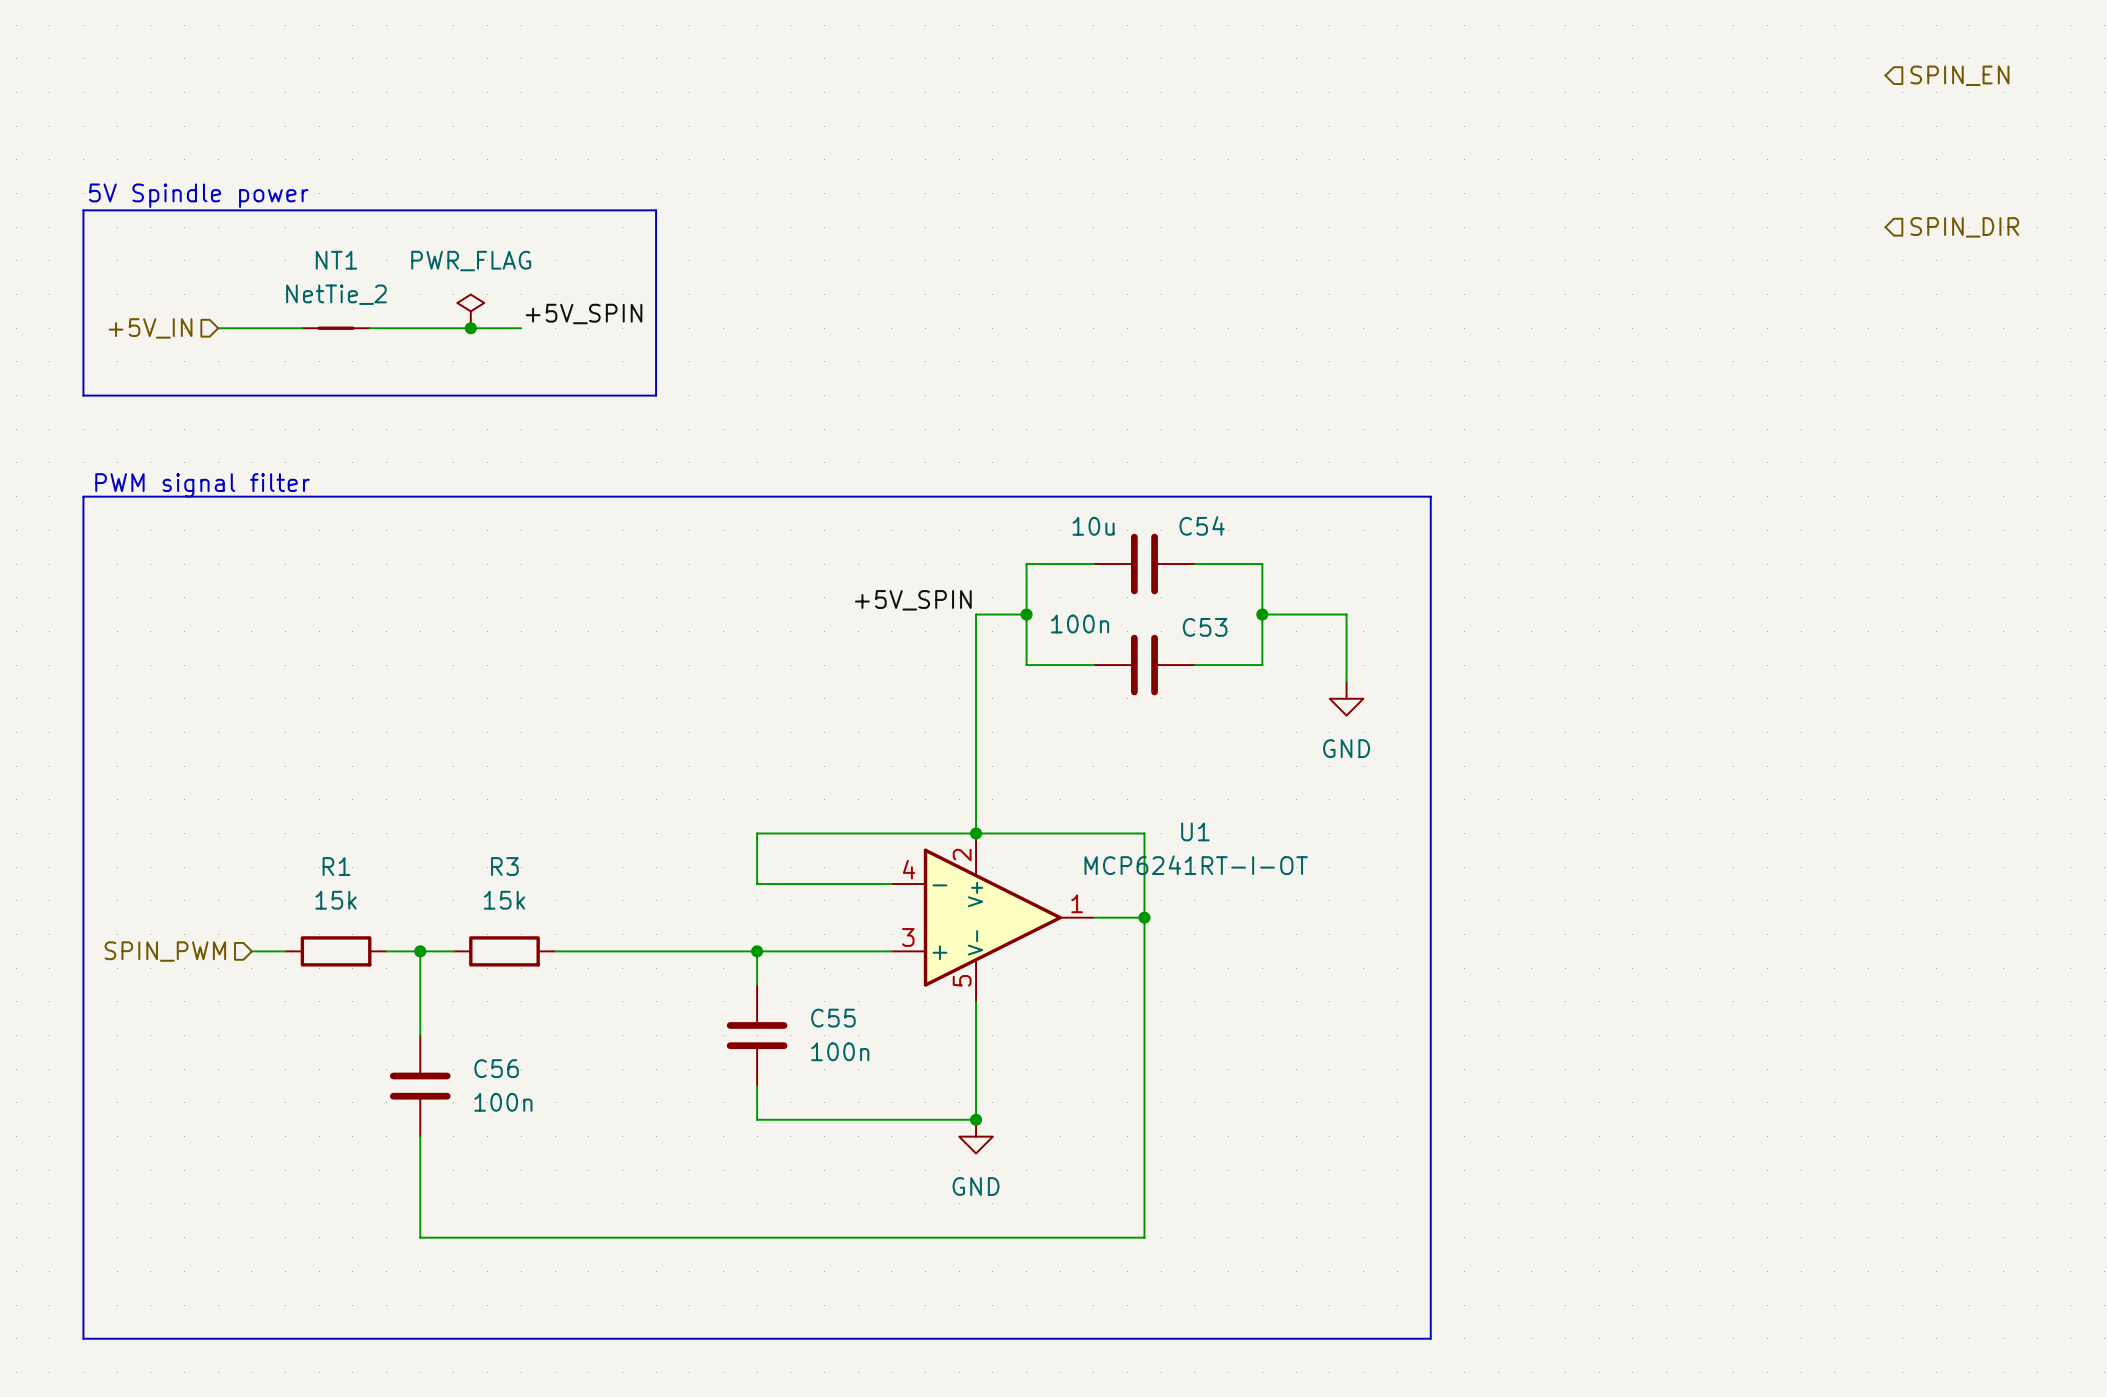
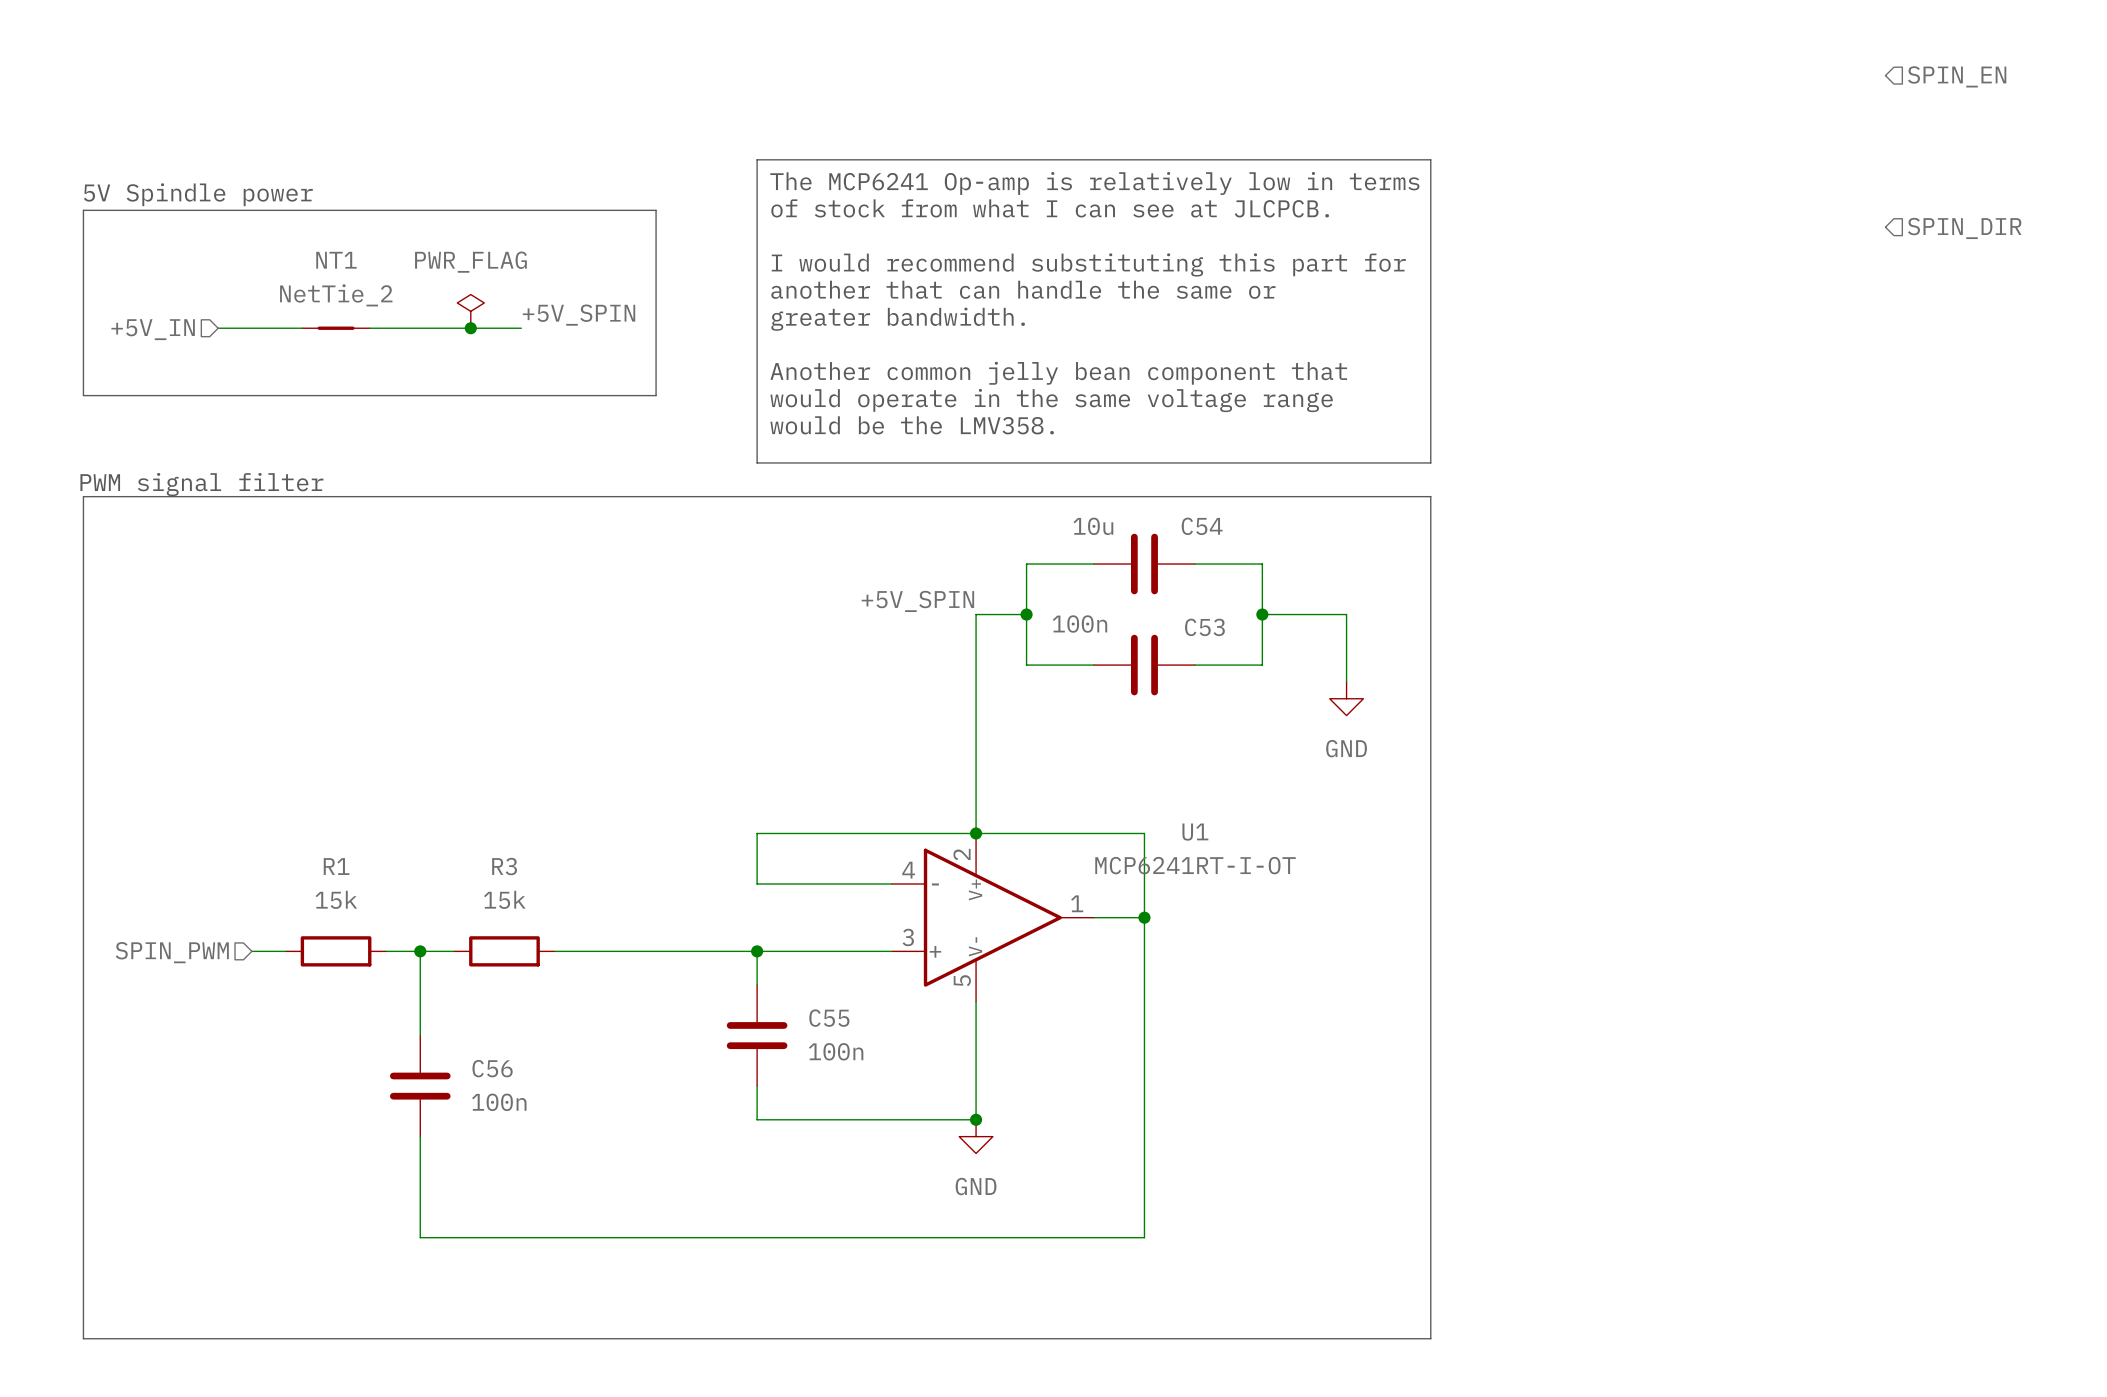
line: none -> (757, 159) (1430, 159) (1430, 462) (757, 462) (757, 159)
text: none -> The MCP6241 Op-amp is relatively low in terms (1094, 183)
text: none -> of stock from what I can see at JLCPCB. (1050, 208)
text: none -> I would recommend substituting this part for (1088, 264)
text: none -> another that can handle the same or (1023, 289)
text: none -> greater bandwidth. (898, 319)
text: none -> Another common jelly bean component that (1058, 373)
text: none -> would operate in the same voltage range (1051, 400)
text: none -> would be the LMV358. (912, 425)

